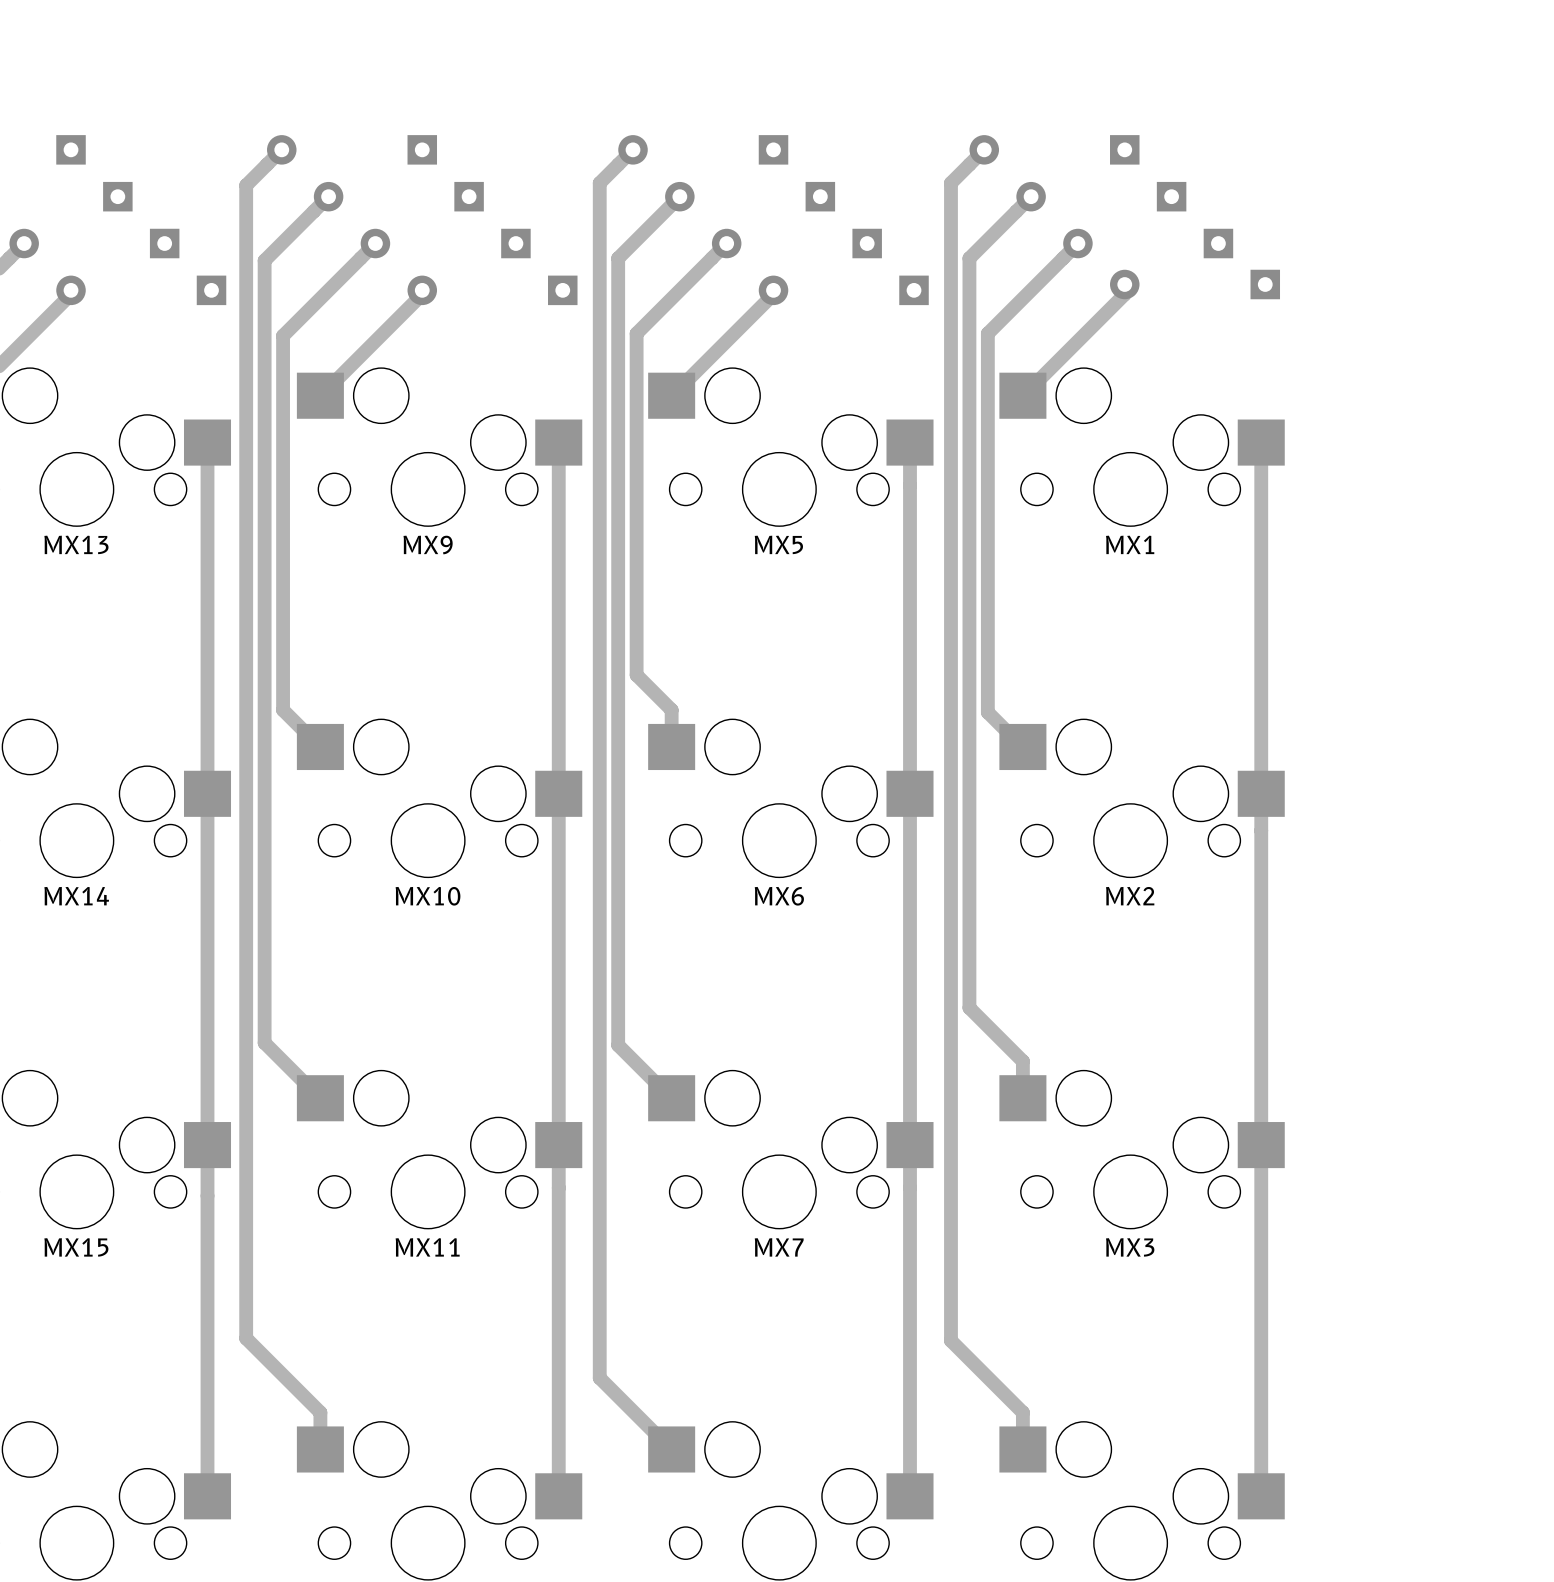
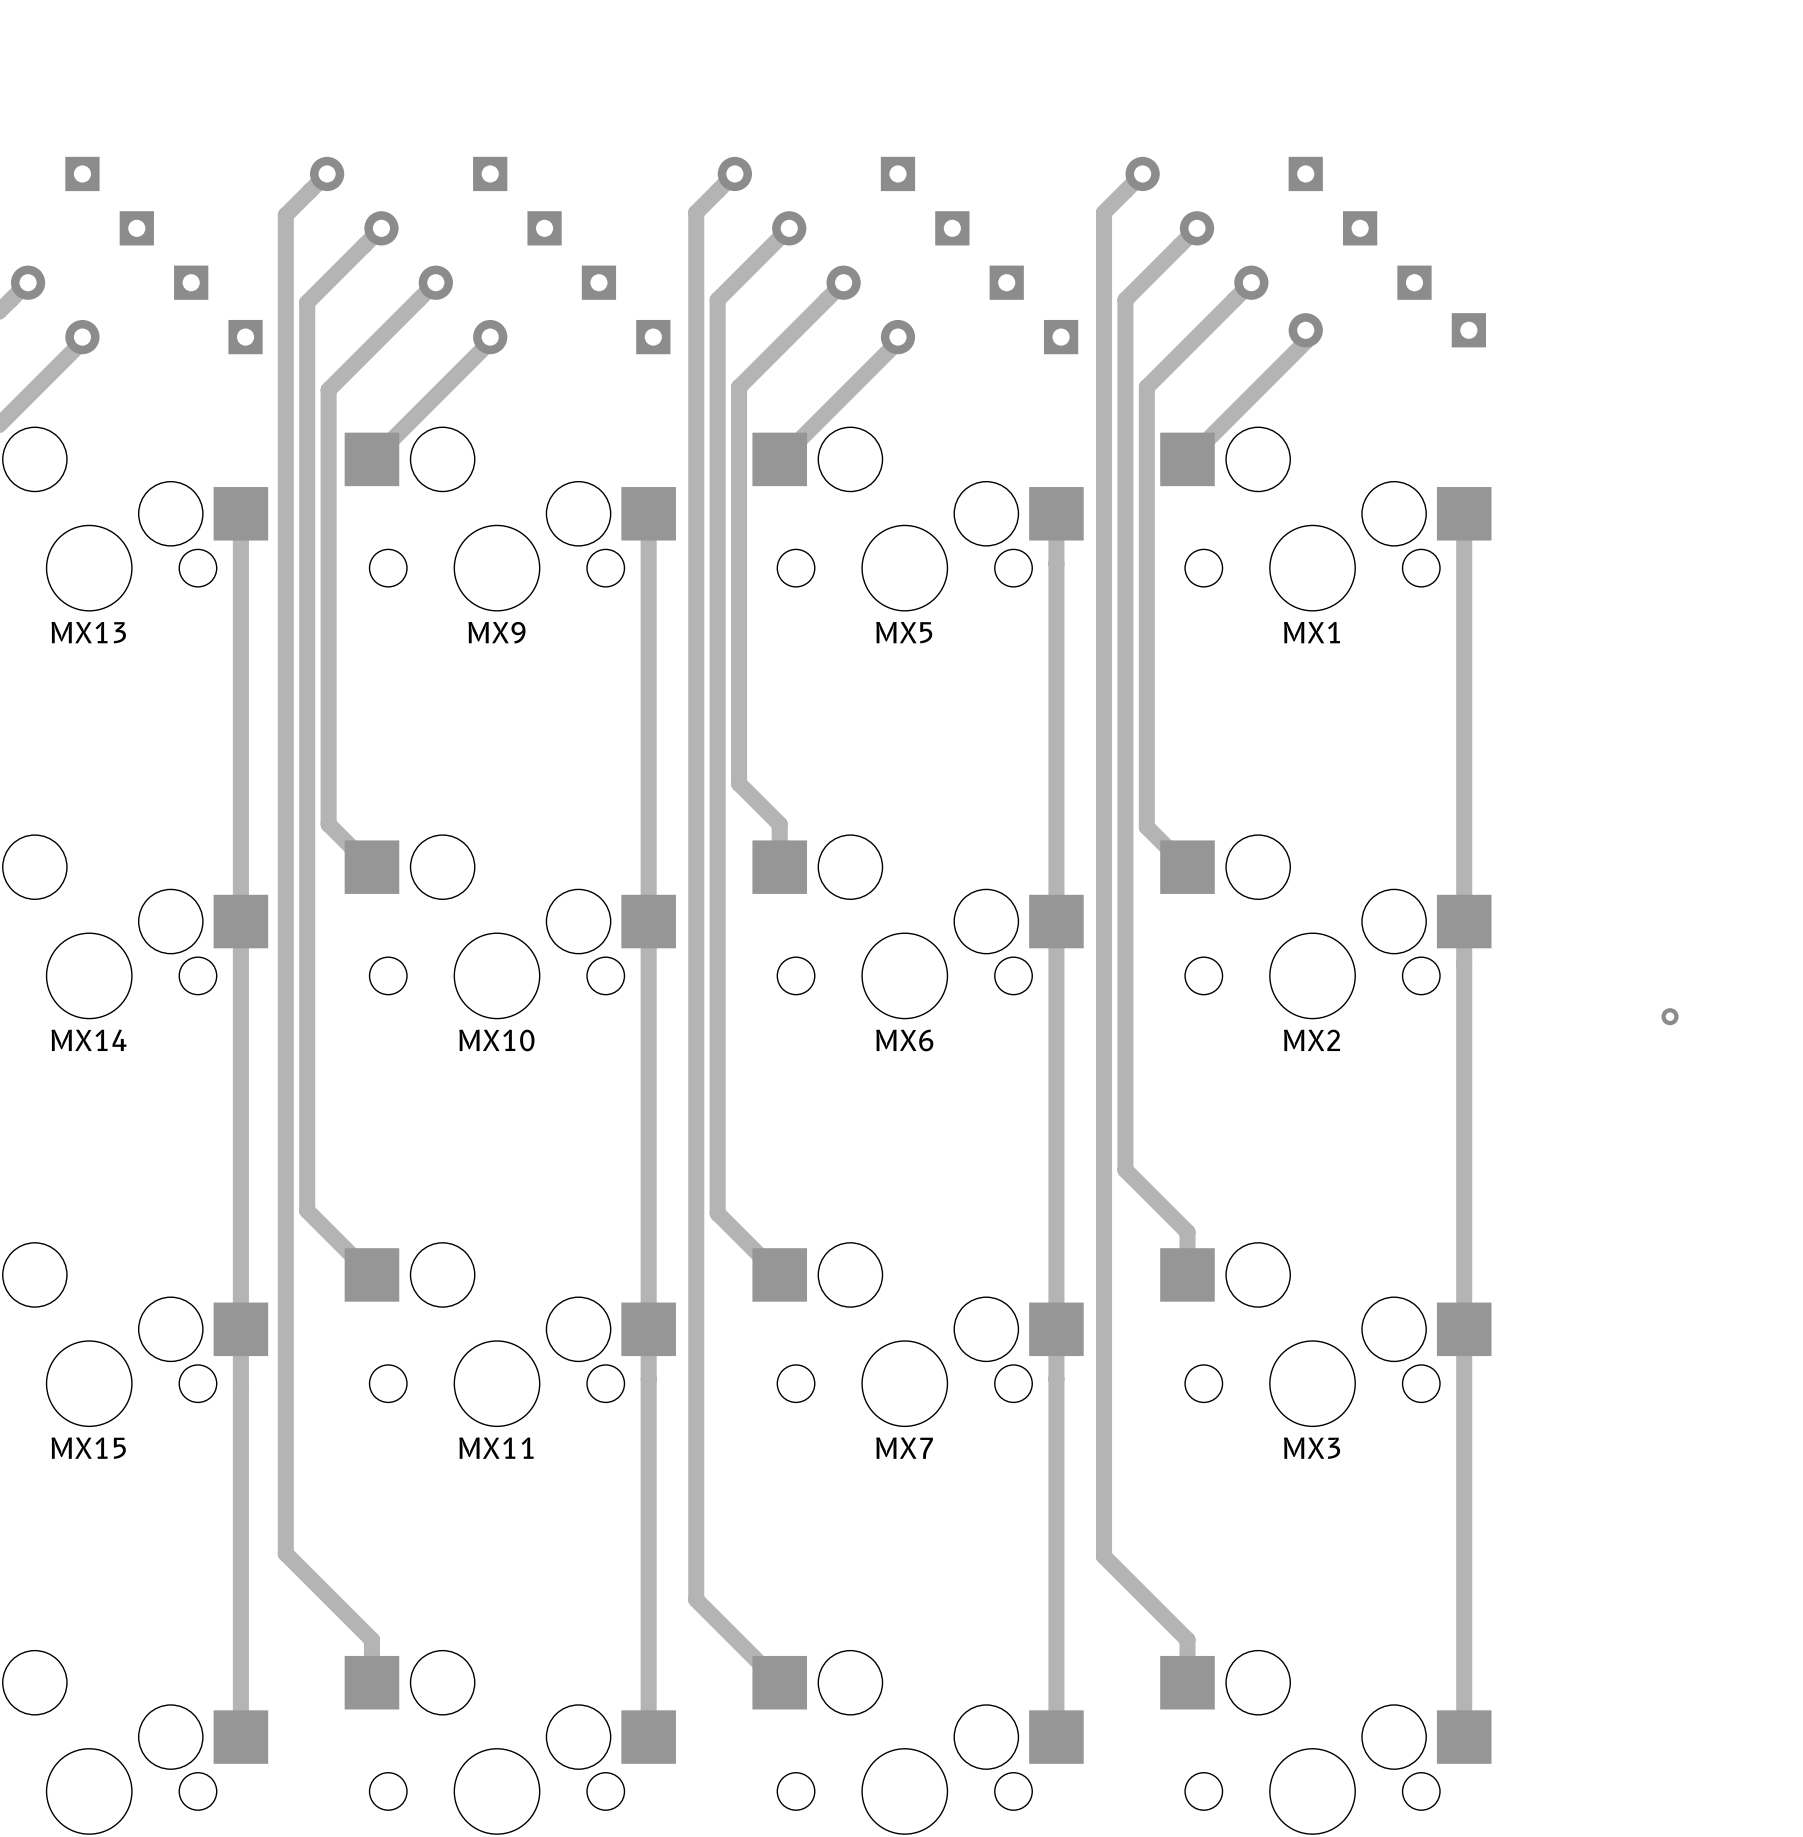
via: none -> (1670, 1016)

